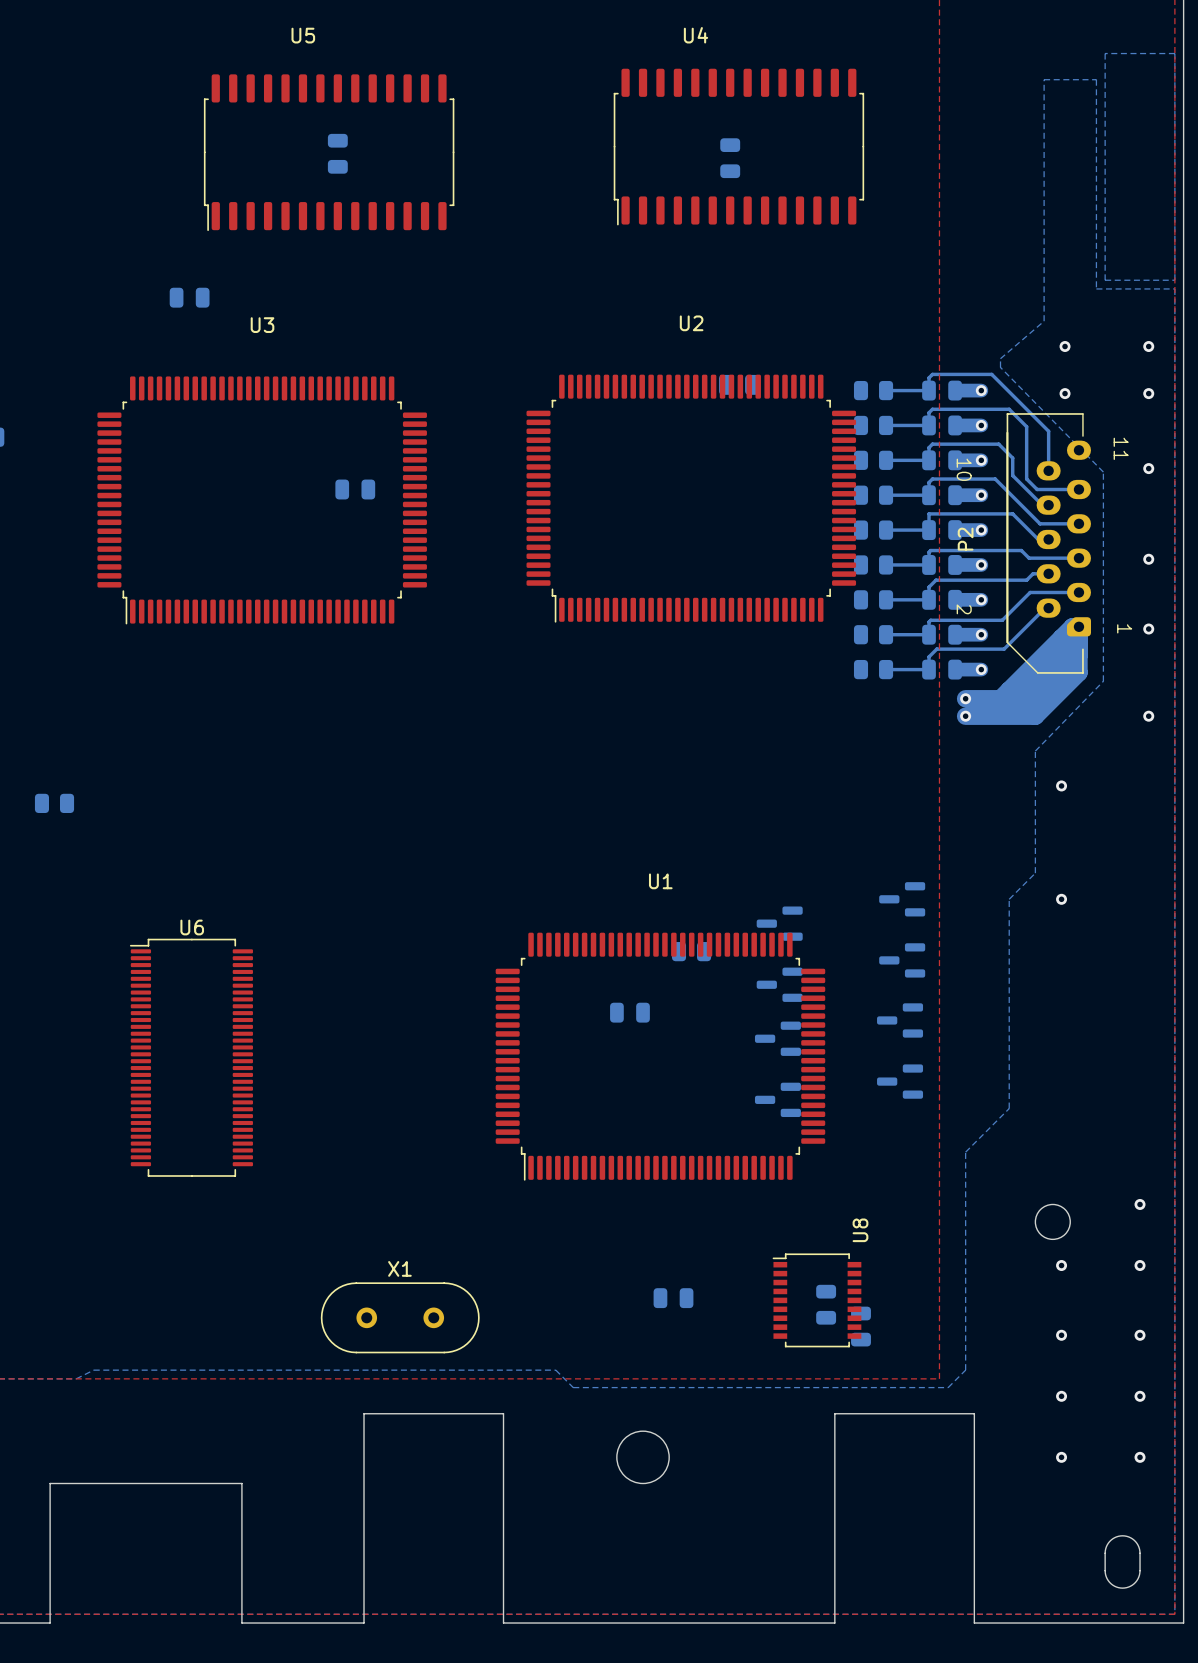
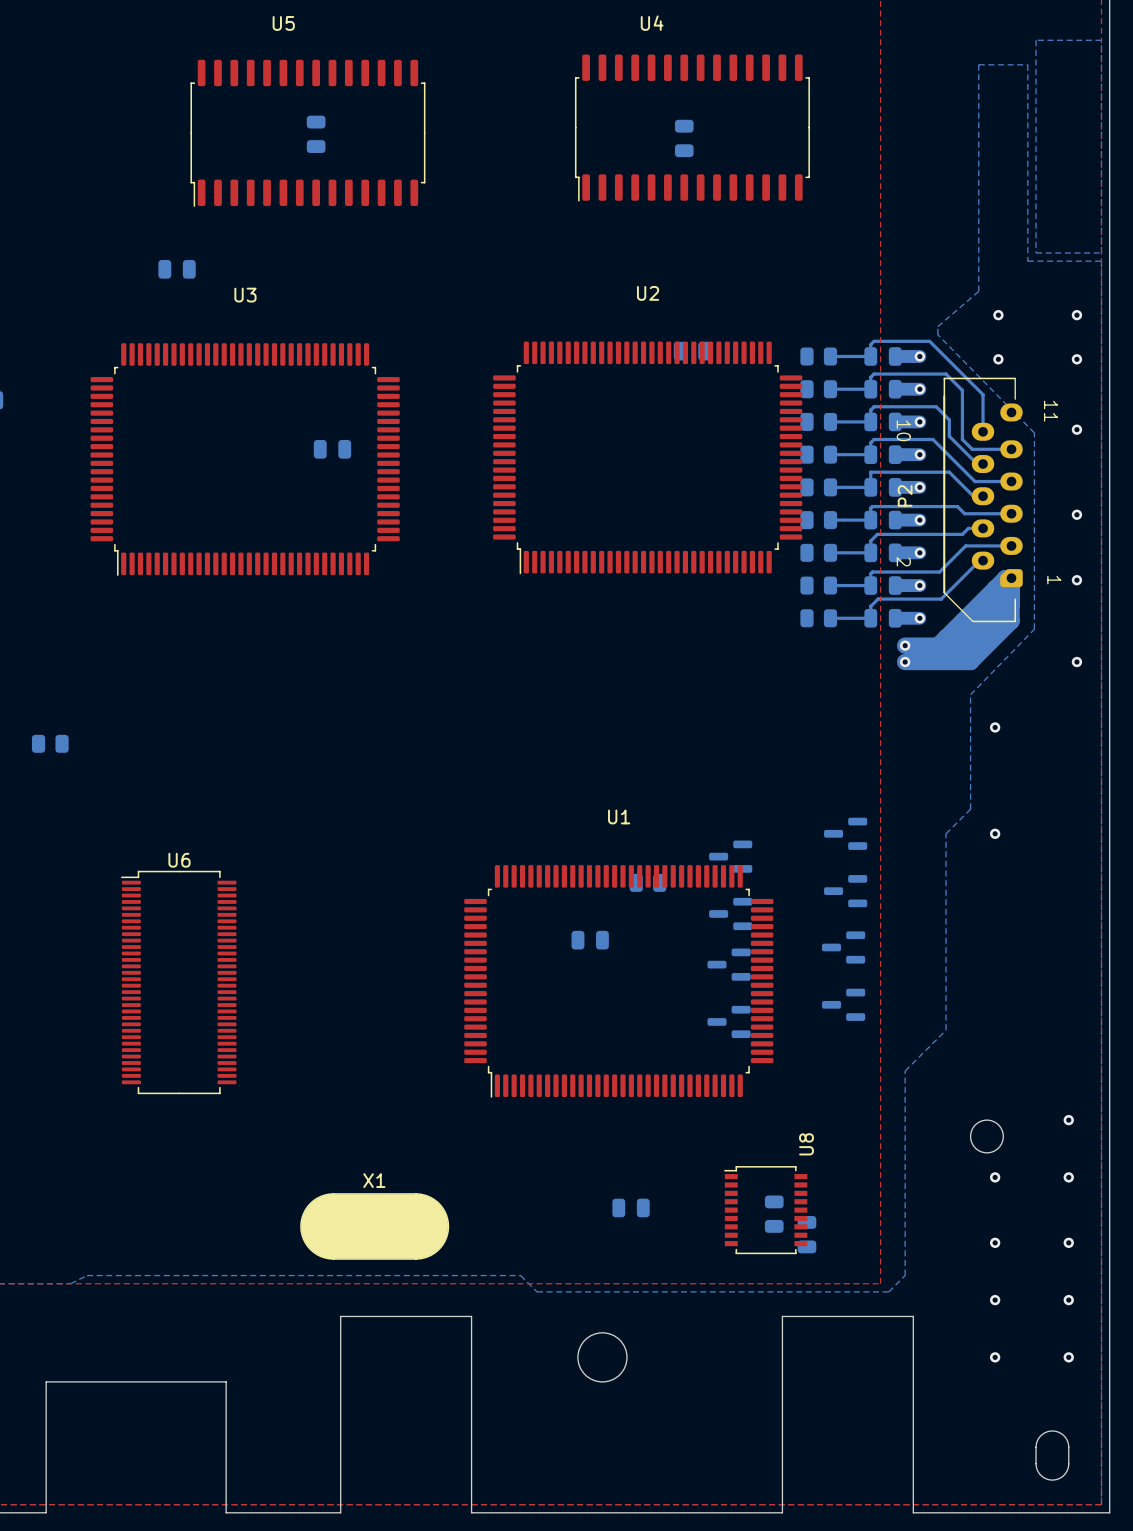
X1 footprint: [320, 1282, 480, 1354] -> [300, 1193, 450, 1260]

